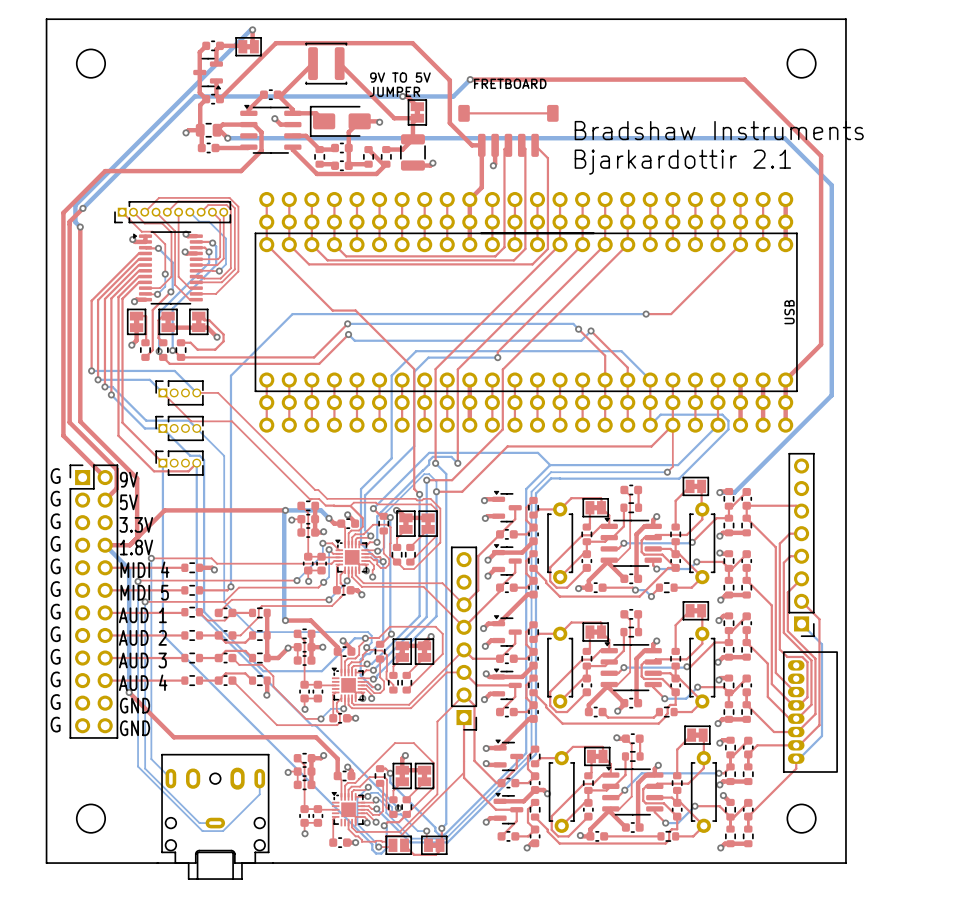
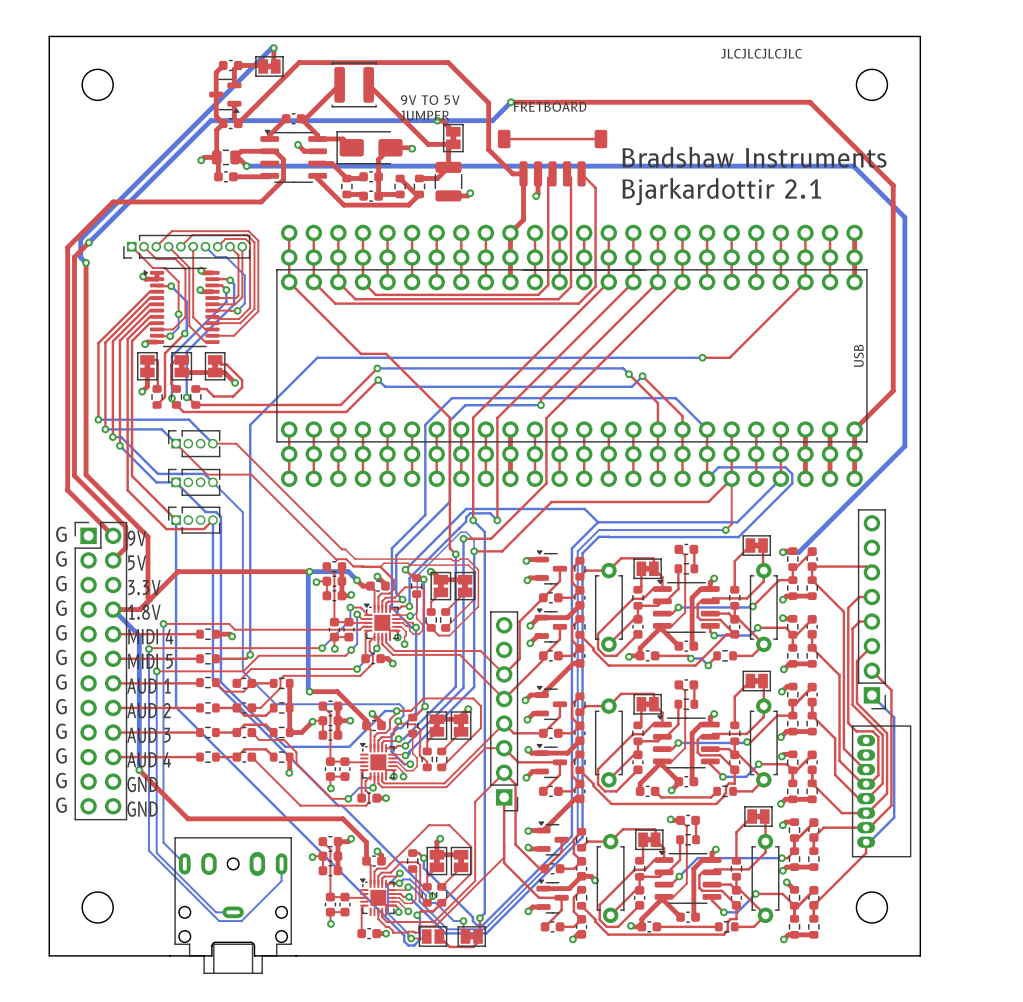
text: none -> JLCJLCJLCJLC (761, 53)

